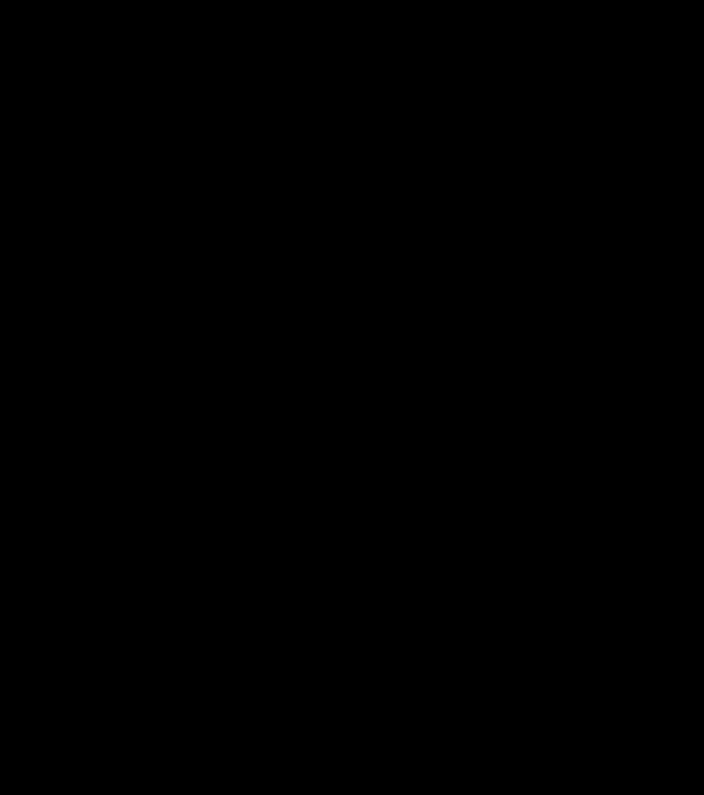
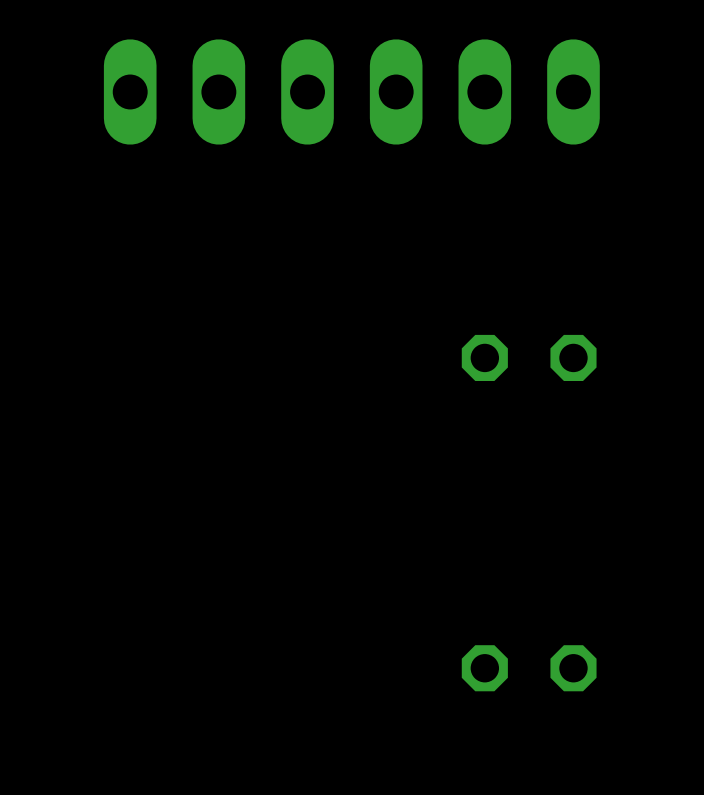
part: none -> (351, 91)
part: none -> (529, 357)
part: none -> (529, 668)

